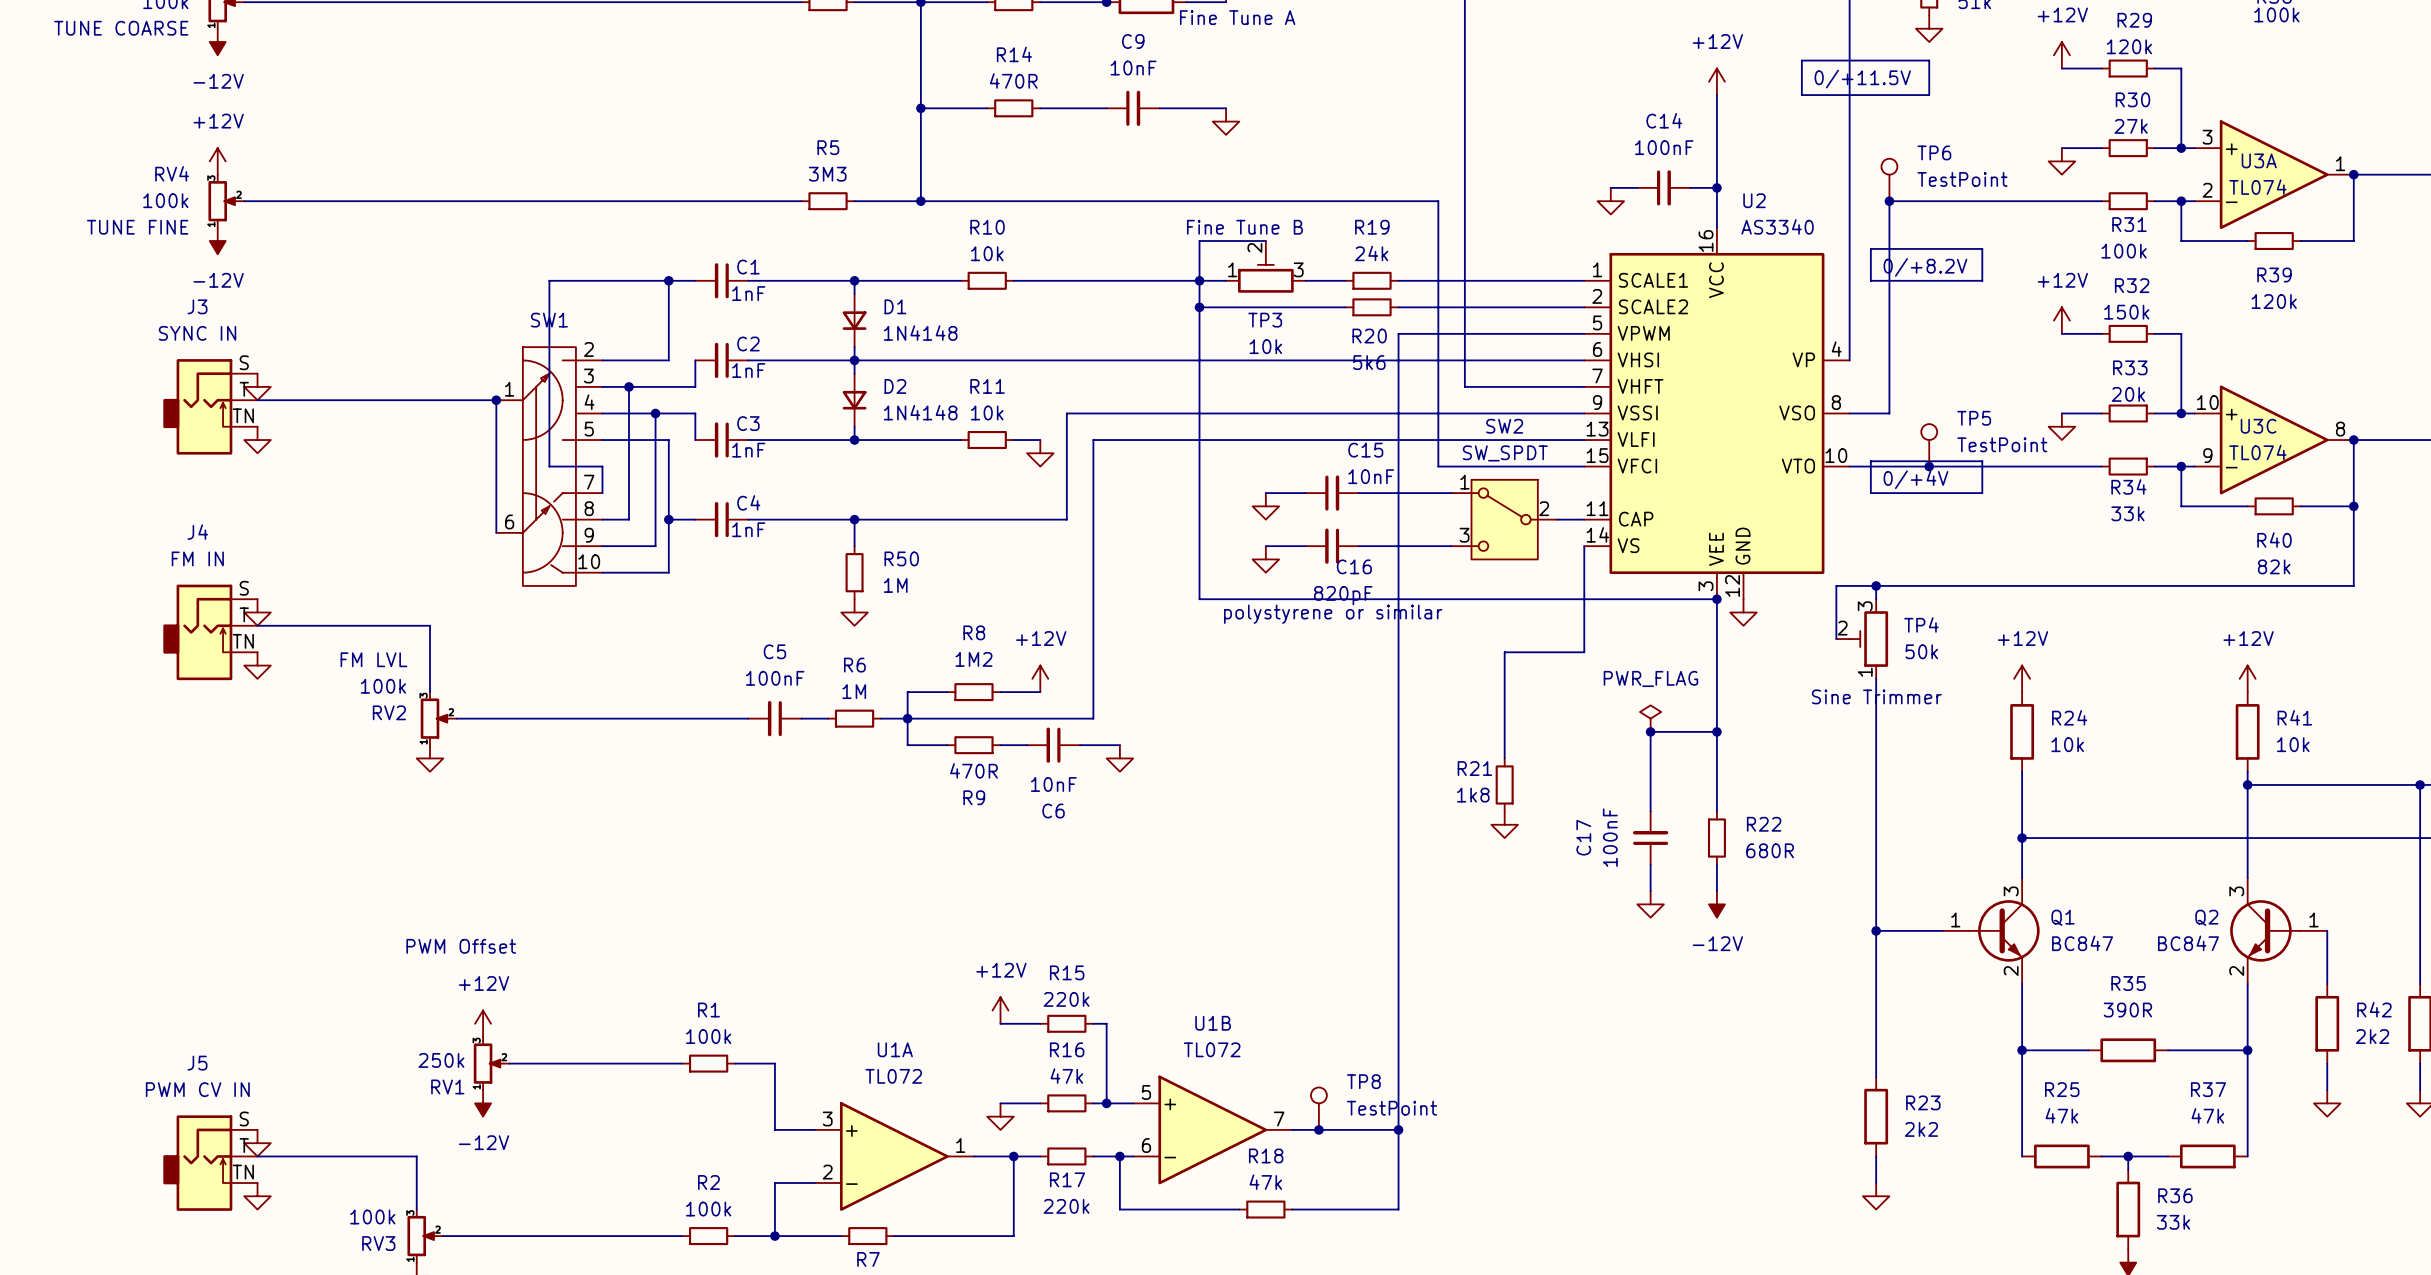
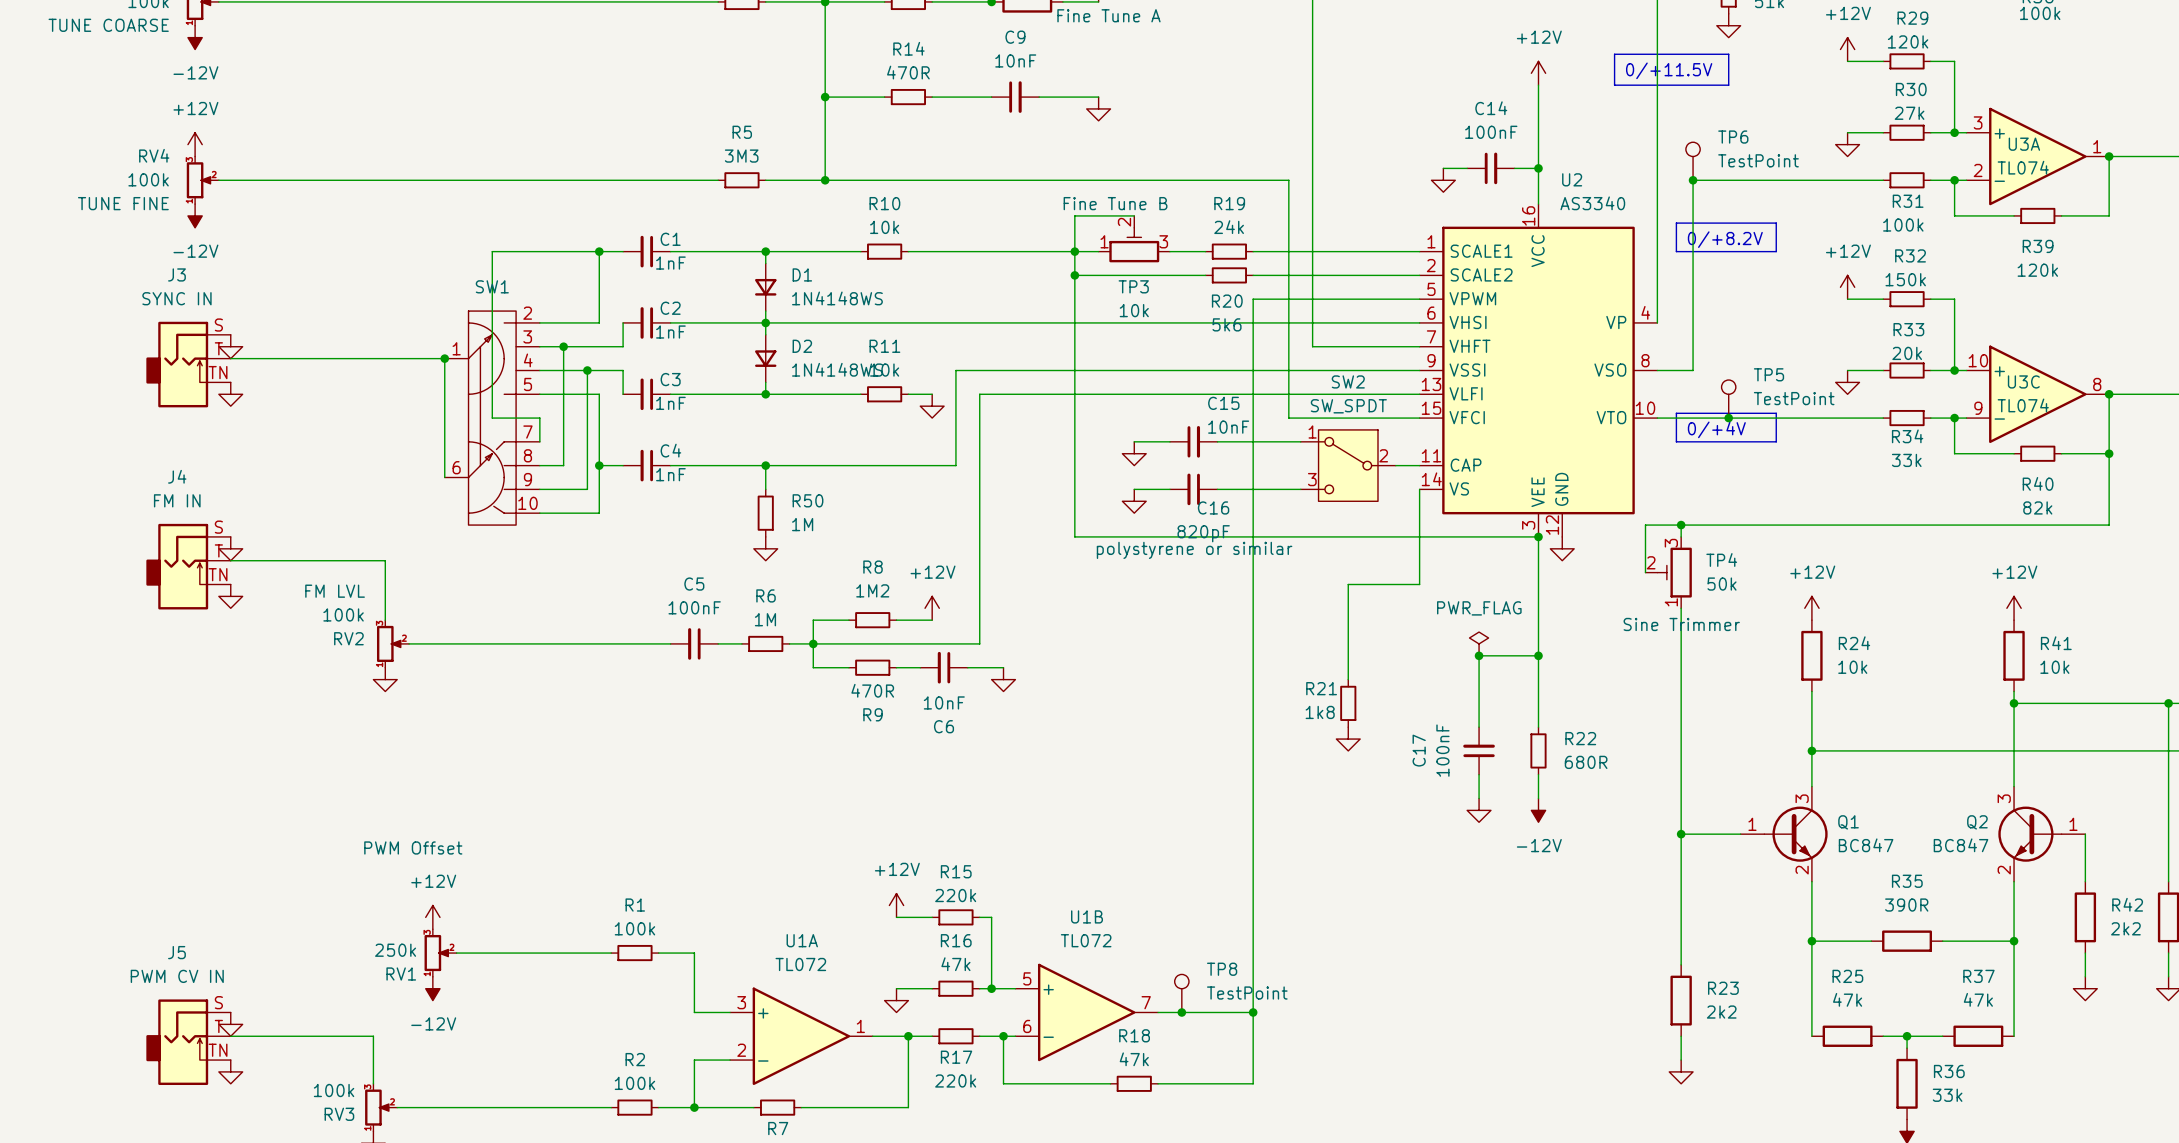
D1 value: 1N4148 (920, 333) -> 1N4148WS (837, 298)
D2 value: 1N4148 (920, 412) -> 1N4148WS (837, 369)

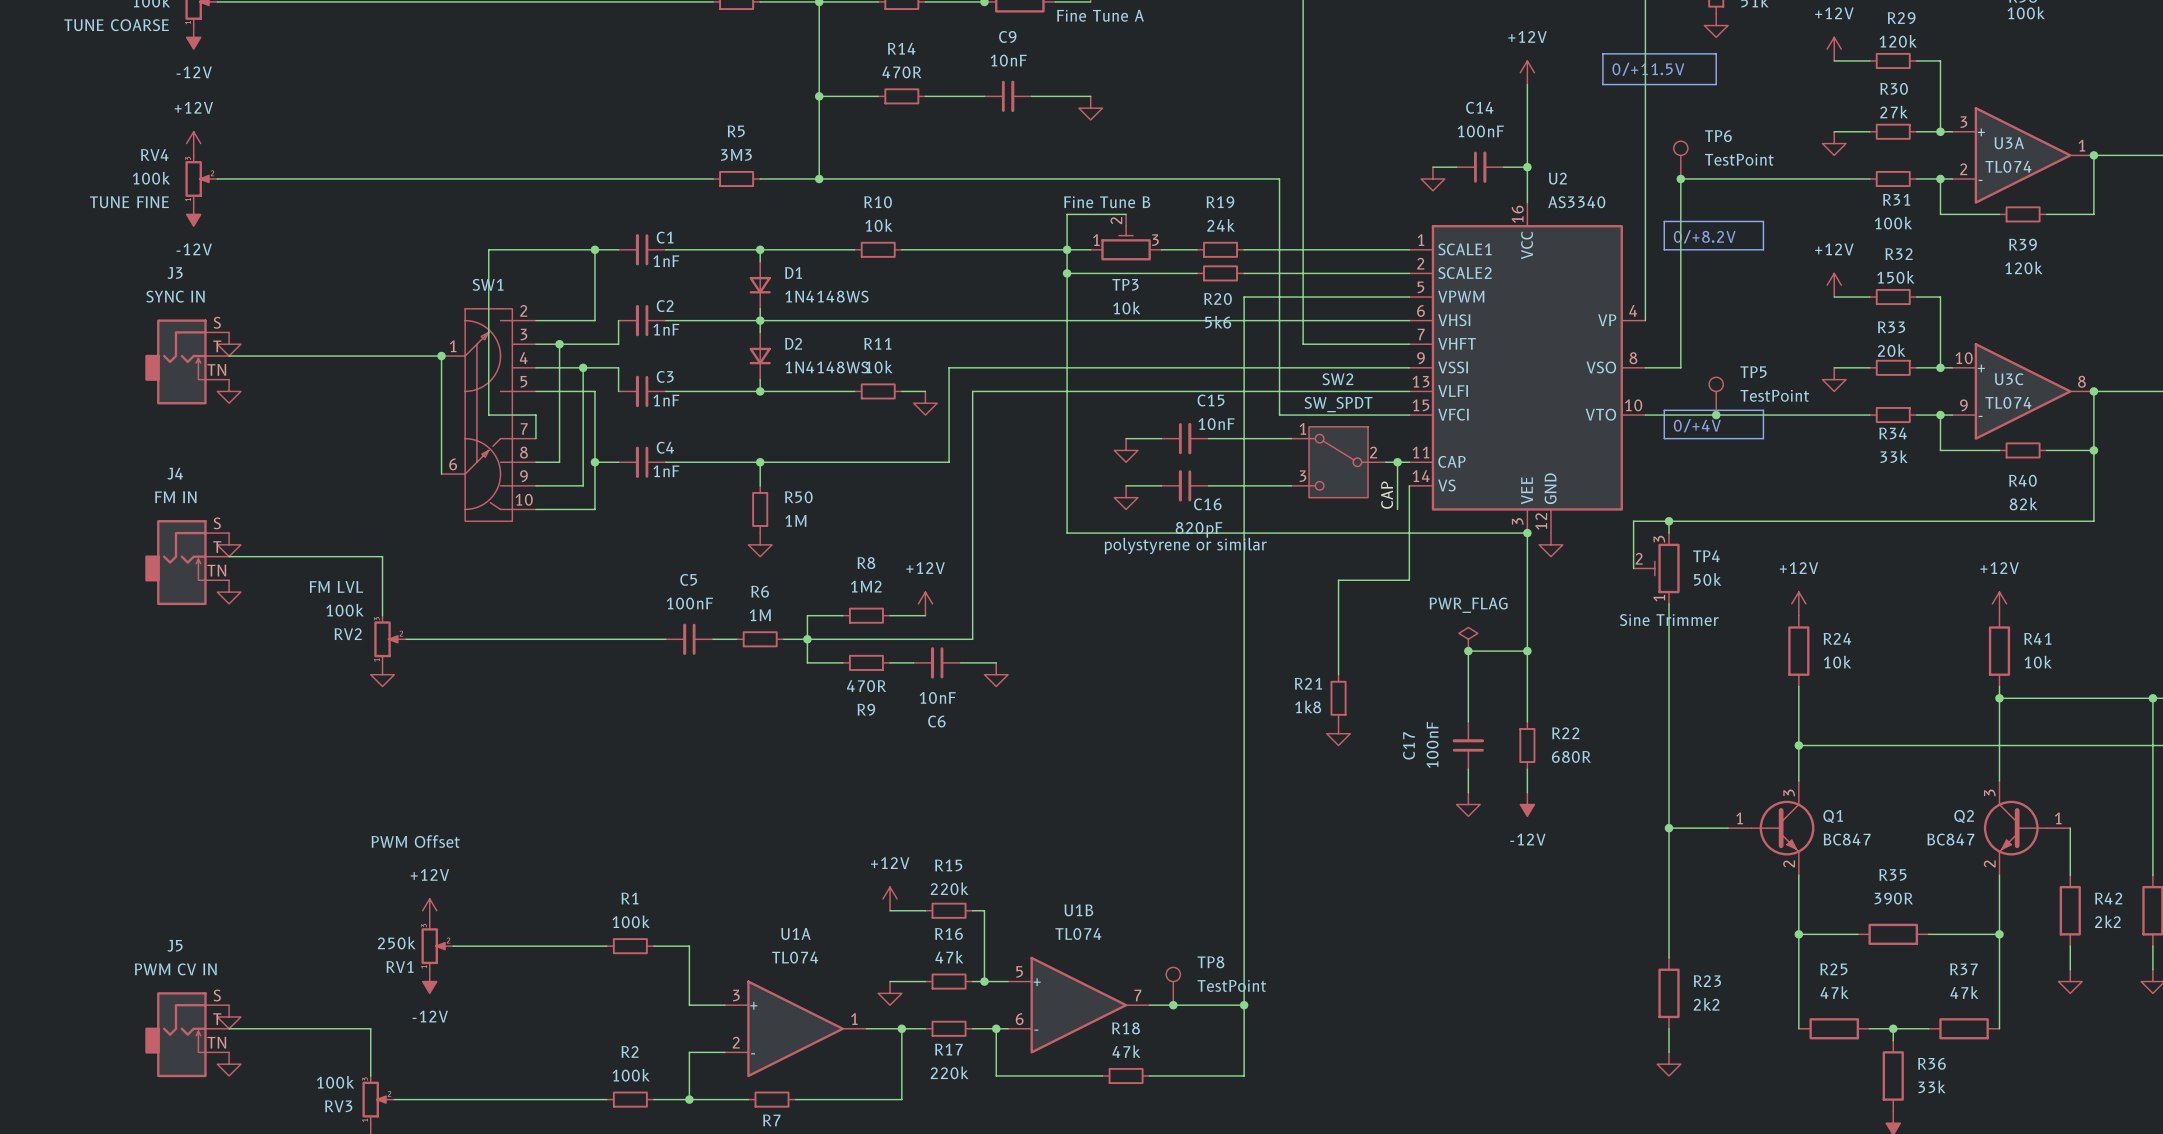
wire: none -> (1397, 462) (1397, 509)
junction: none -> (1397, 462)
label: none -> CAP (1387, 495)
U1B value: TL072 (1086, 940) -> TL074 (1078, 933)
U1A value: TL072 (800, 964) -> TL074 (795, 957)

